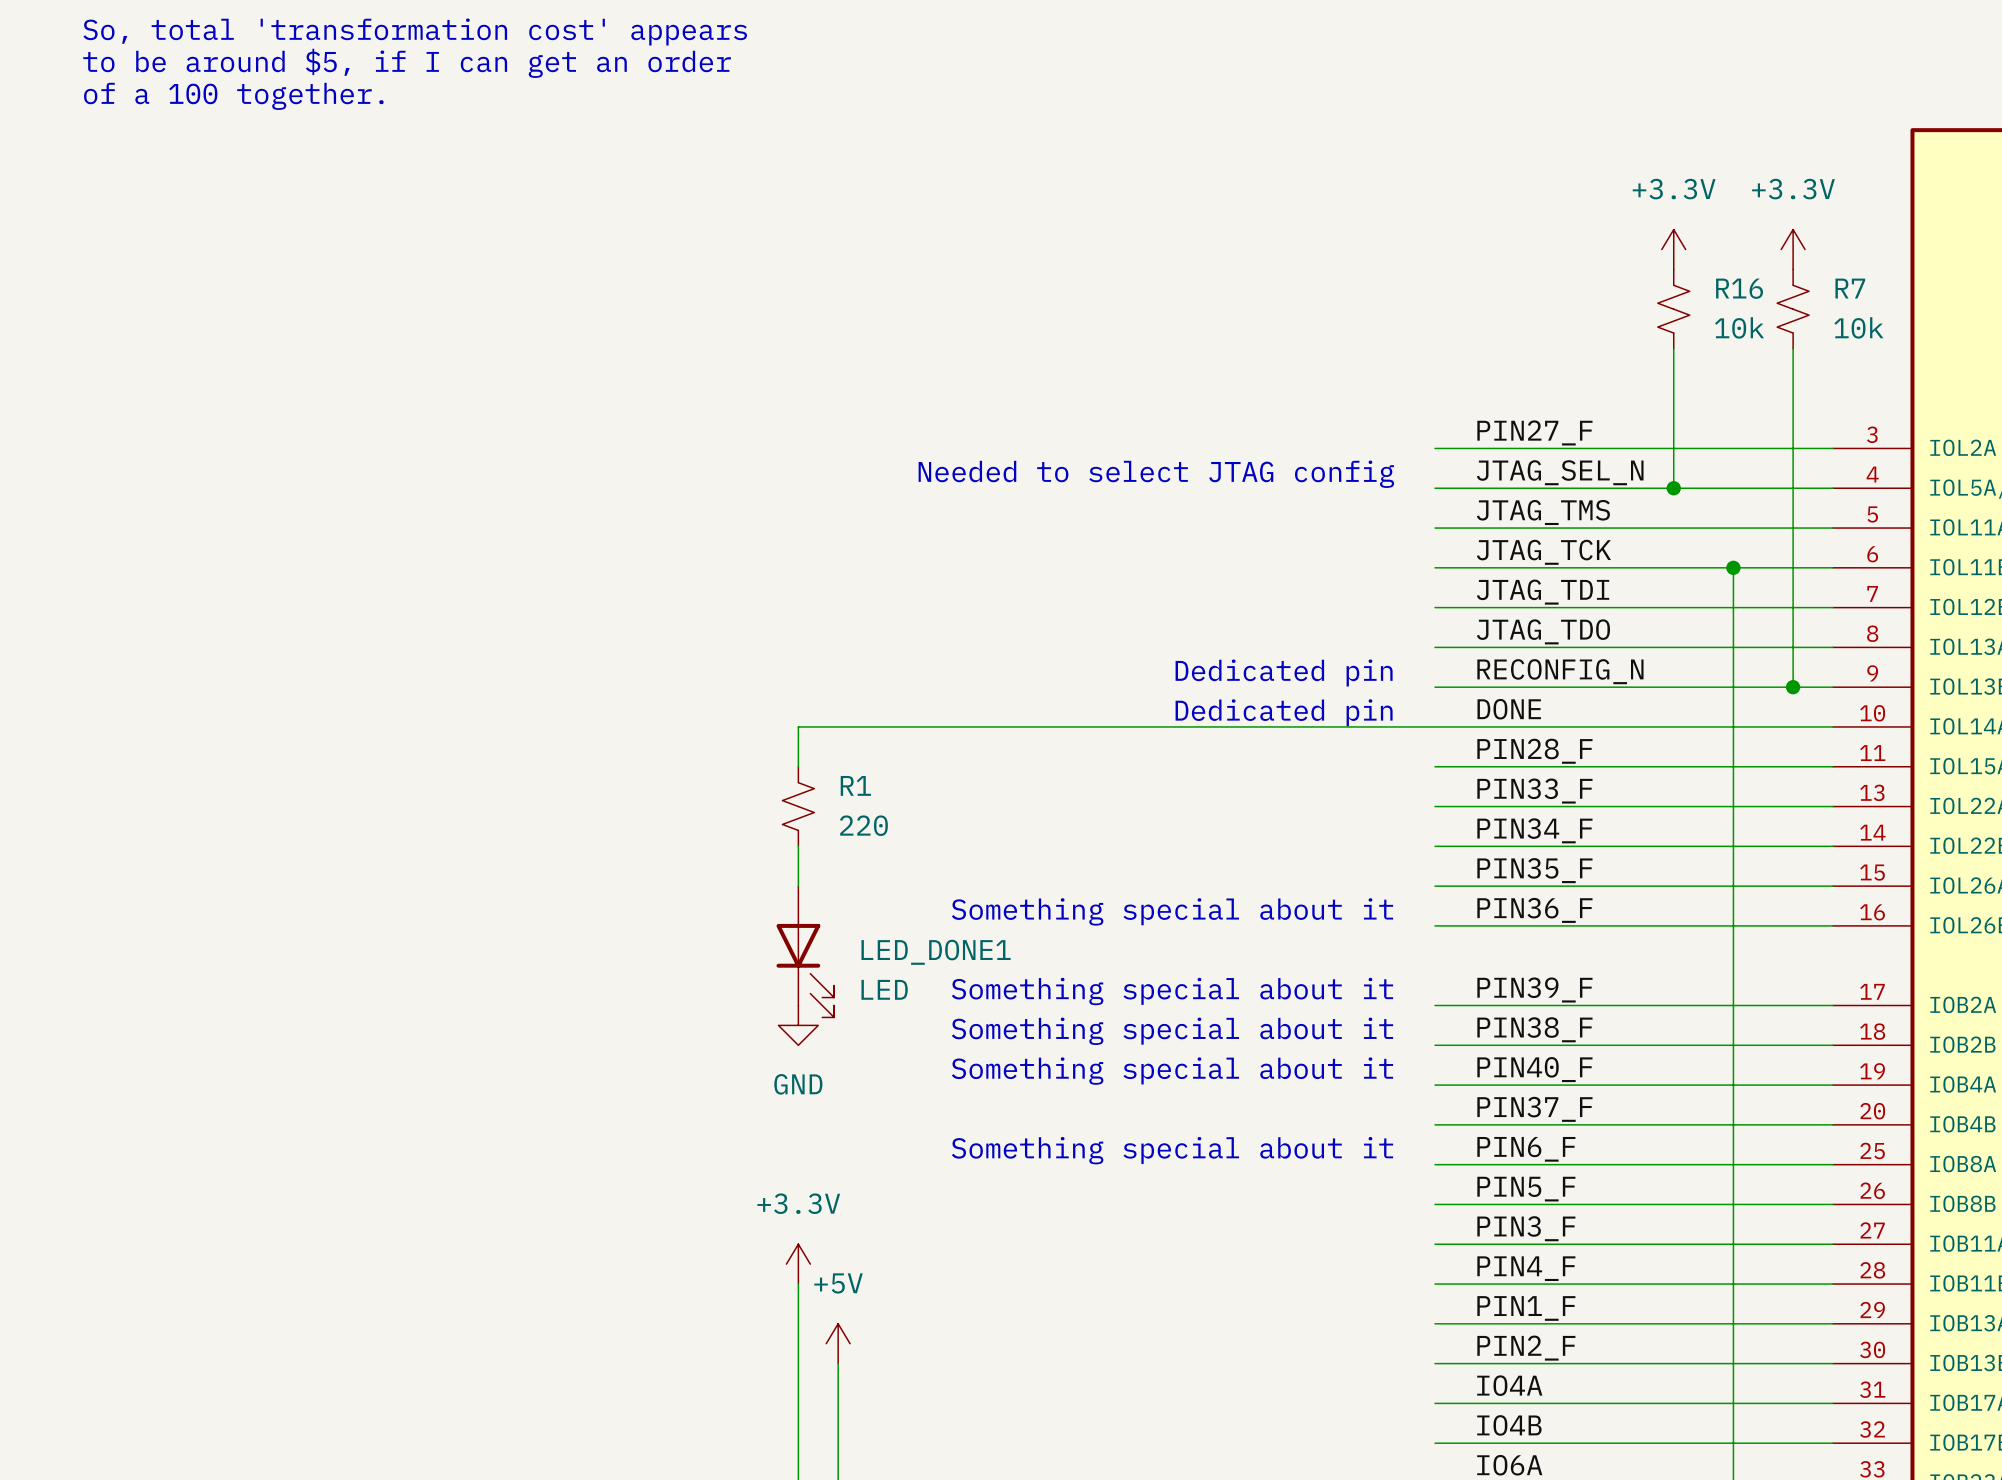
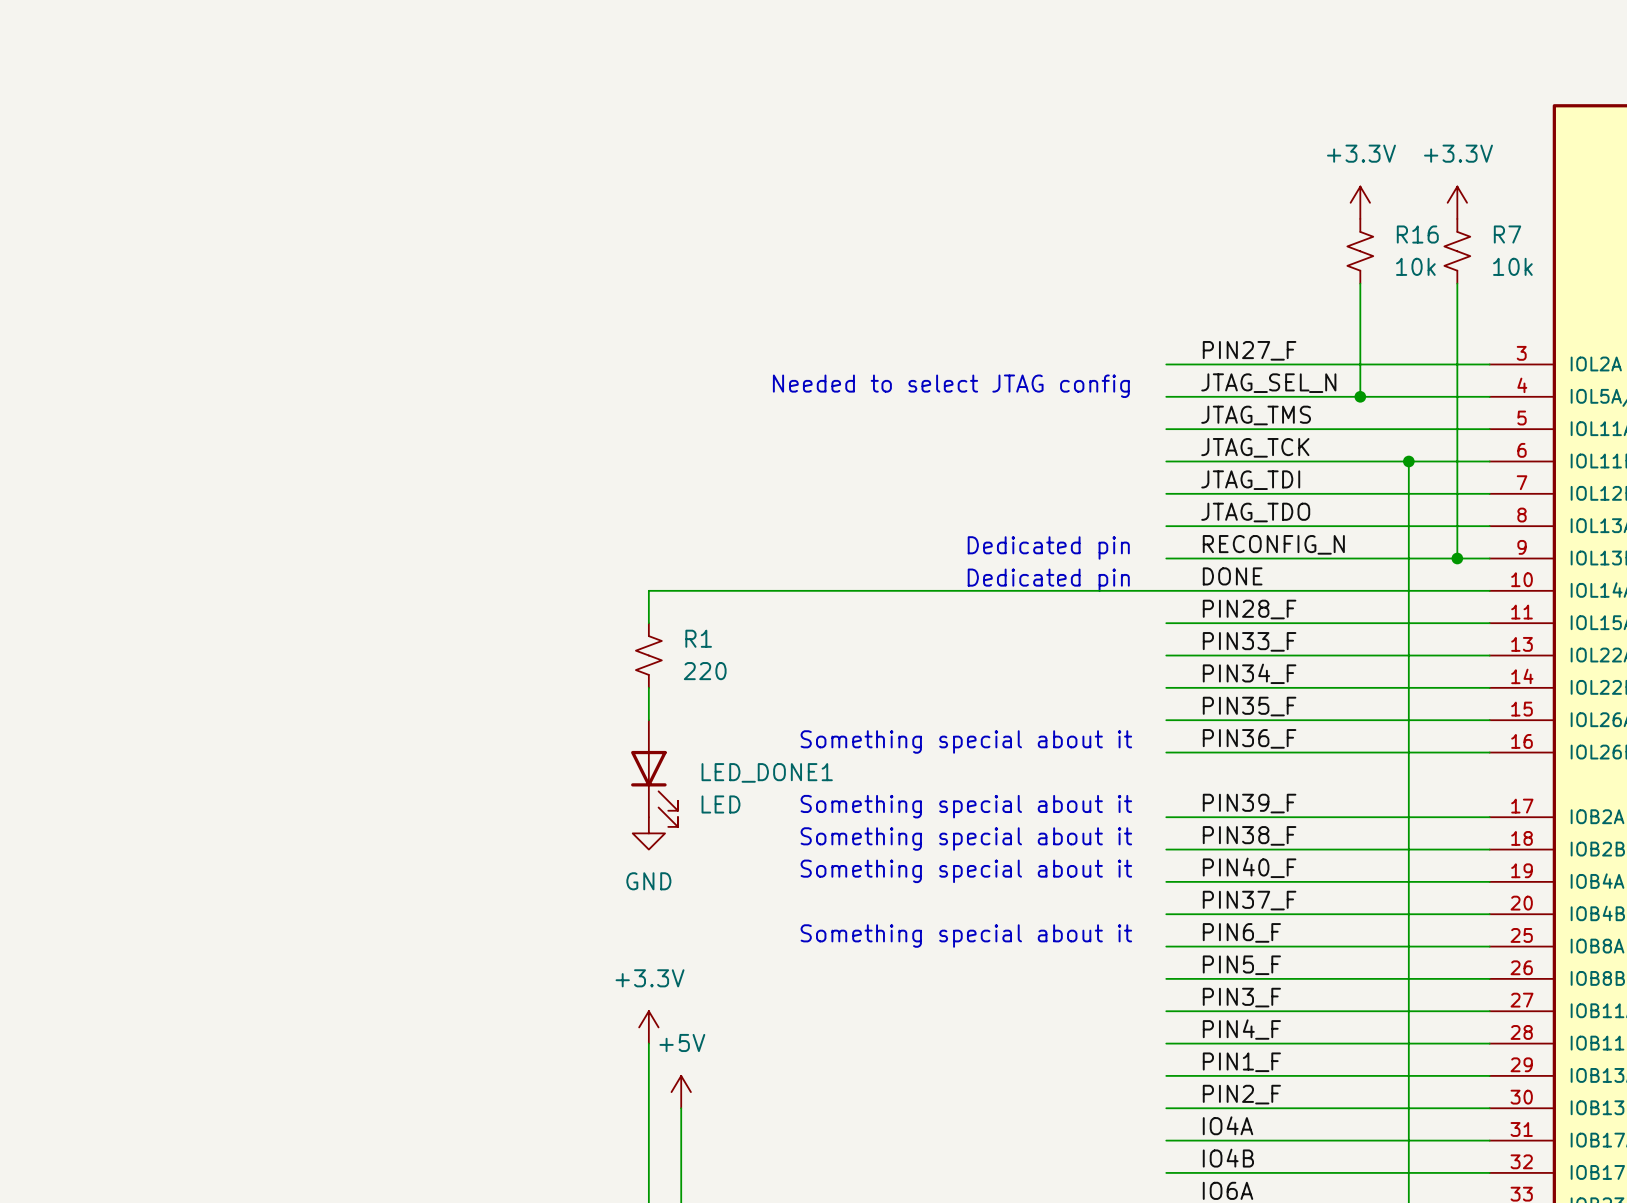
text: So, total 'transformation cost' appears (415, 32) -> none
text: to be around $5, if I can get an order (407, 63) -> none
text: of a 100 together. (233, 96) -> none

